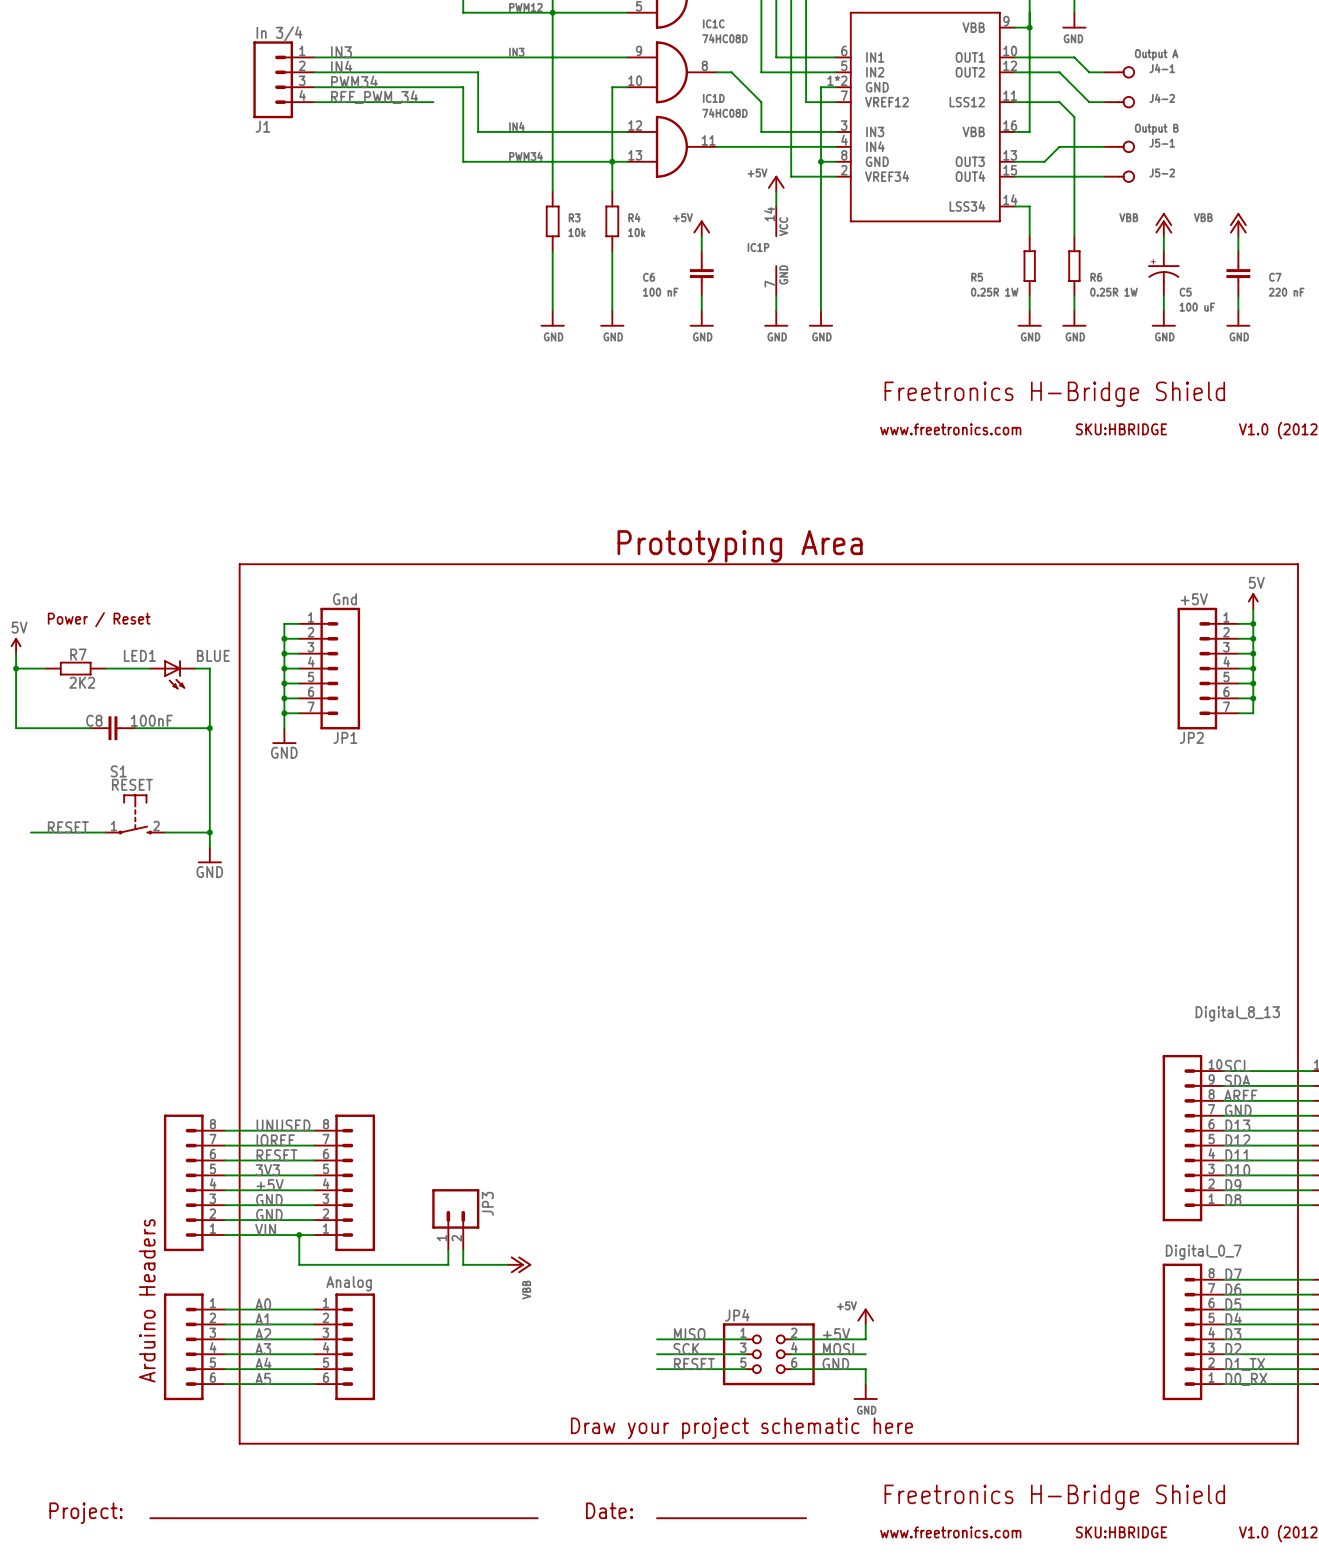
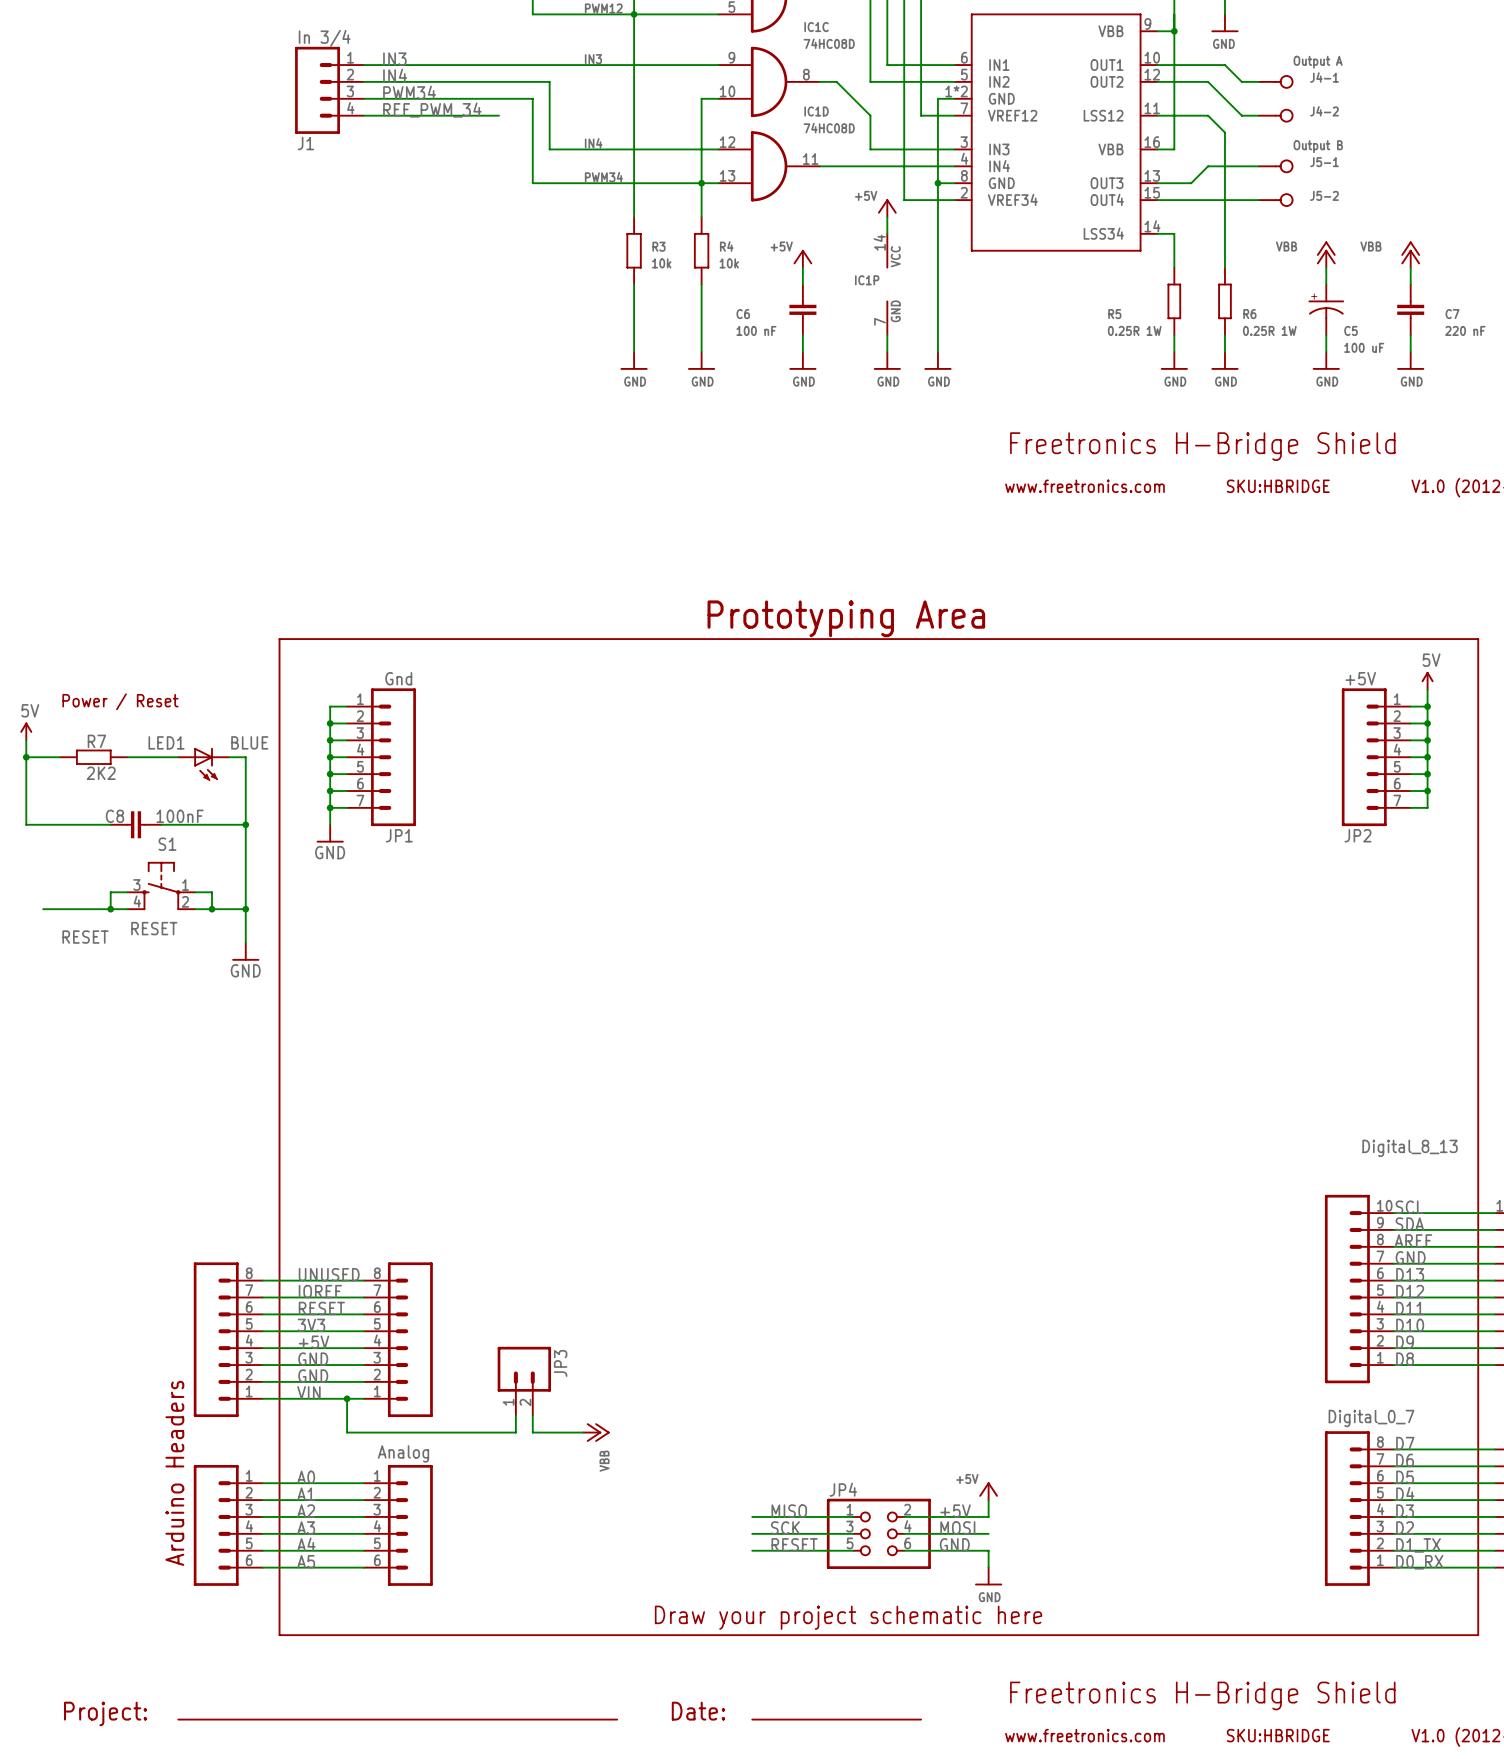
S1 name position: S1 (118, 771) -> S1 (167, 844)
S1 value position: RESET (132, 784) -> RESET (154, 928)
wire: none -> (127, 892) (110, 892) (110, 909)
wire: none -> (195, 892) (212, 892) (212, 909)
S1 symbol: [105, 794, 166, 835] -> [127, 861, 196, 910]
junction: none -> (110, 909)
wire: none -> (195, 909) (245, 909)
junction: none -> (212, 909)
junction: none -> (245, 909)
wire: (30, 832) (105, 832) -> (43, 909) (127, 909)
wire: (165, 832) (209, 832) (209, 847) -> none
junction: (209, 832) -> none
power symbol position: GND (209, 855) -> GND (245, 951)

